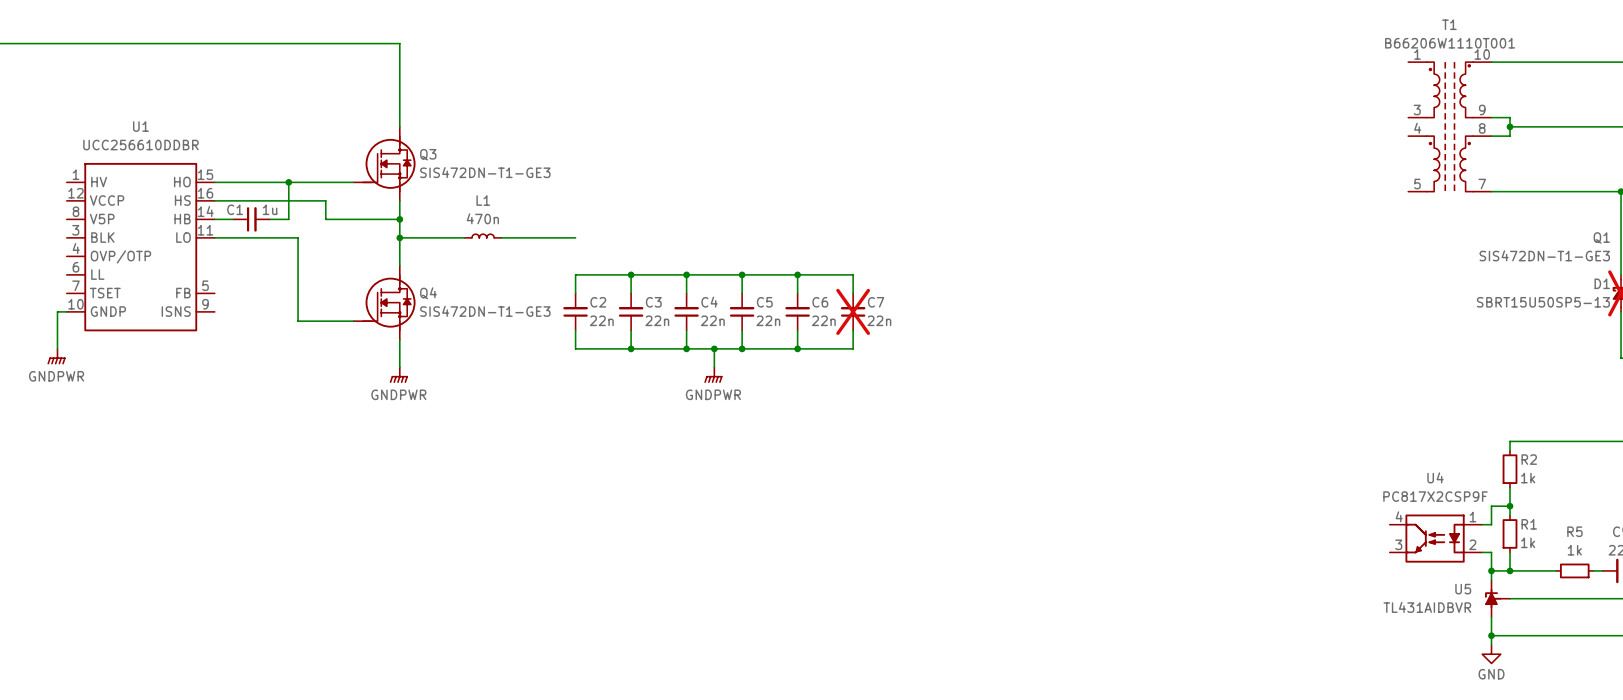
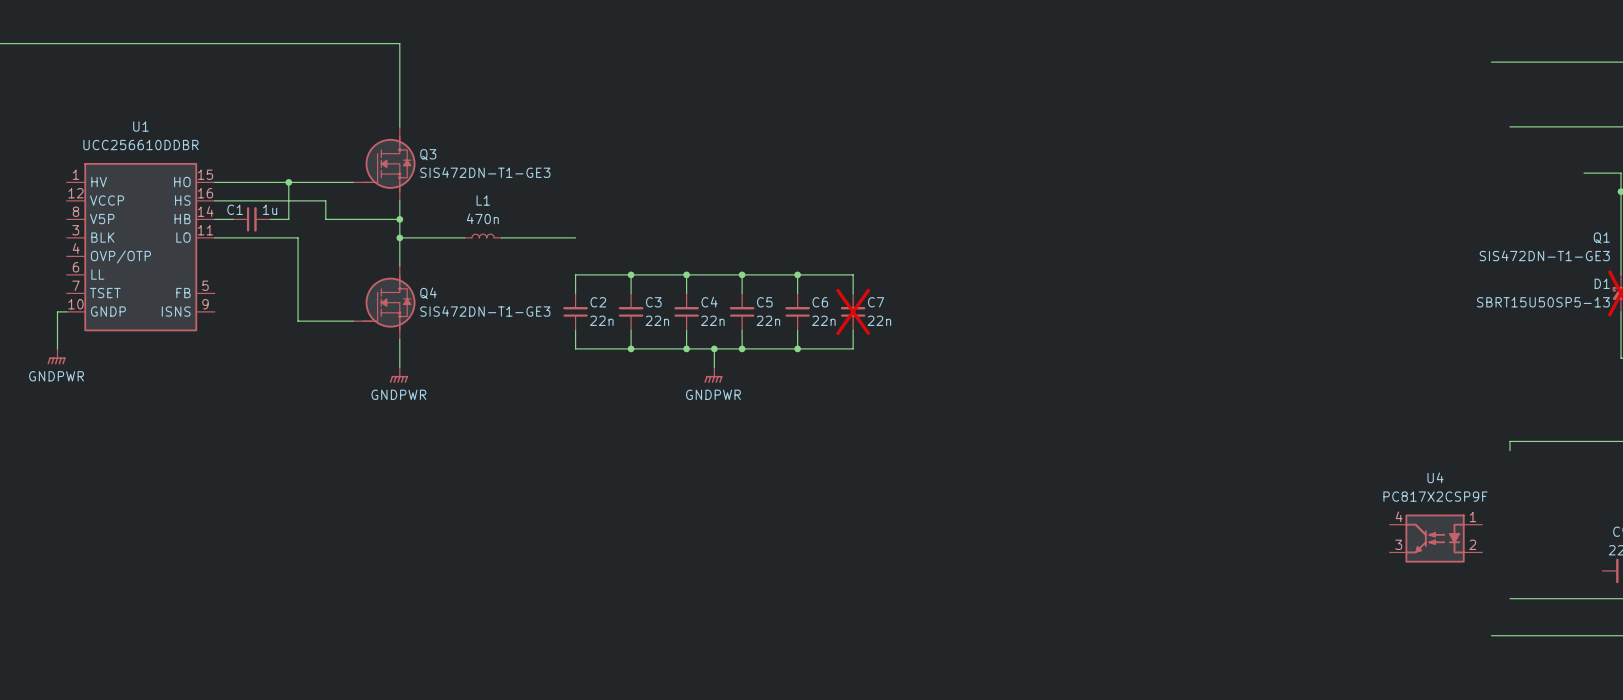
wire: (1491, 117) (1510, 117) (1510, 136) (1491, 136) -> none
T1: (1449, 126) -> none
junction: (1510, 126) -> none
wire: (1491, 191) (1621, 191) -> (1584, 173) (1621, 173) (1621, 191)
R2: (1510, 469) -> none
wire: (1510, 487) (1510, 515) -> none
wire: (1510, 506) (1491, 506) (1491, 524) (1482, 524) -> none
junction: (1510, 506) -> none
R1: (1510, 533) -> none
wire: (1482, 552) (1491, 552) (1491, 580) -> none
wire: (1510, 552) (1510, 570) -> none
wire: (1491, 570) (1556, 570) -> none
junction: (1491, 570) -> none
junction: (1510, 570) -> none
R5: (1574, 570) -> none
wire: (1593, 570) (1602, 570) -> none
U5: (1497, 598) -> none
wire: (1491, 617) (1491, 644) -> none
junction: (1491, 635) -> none
power symbol: GND (1491, 654) -> none

